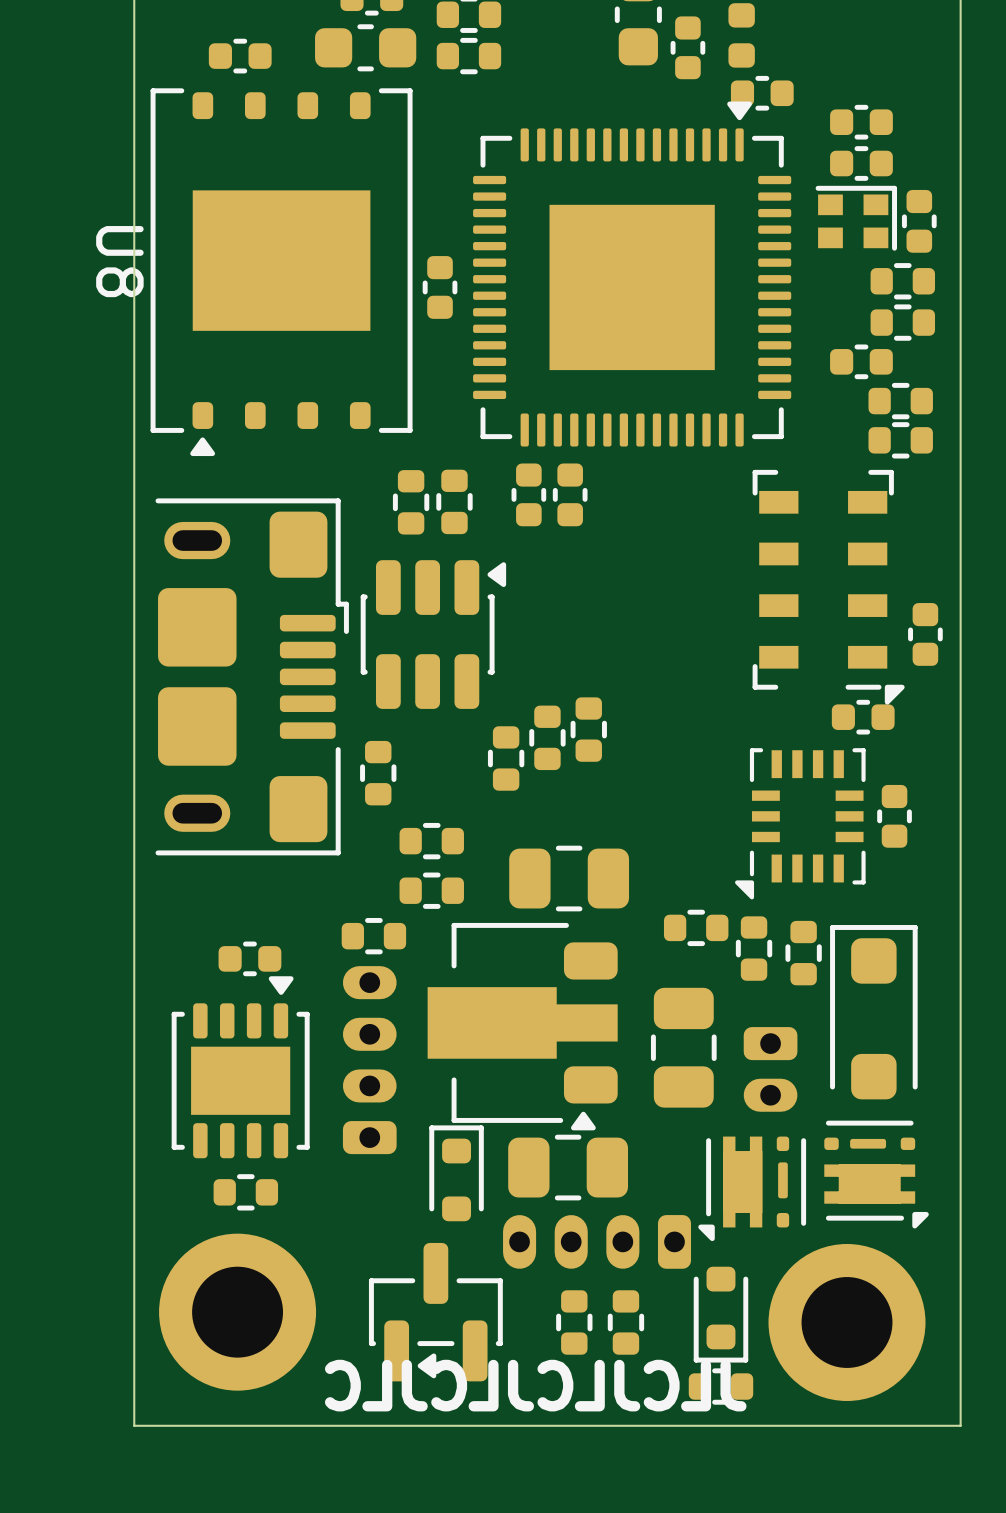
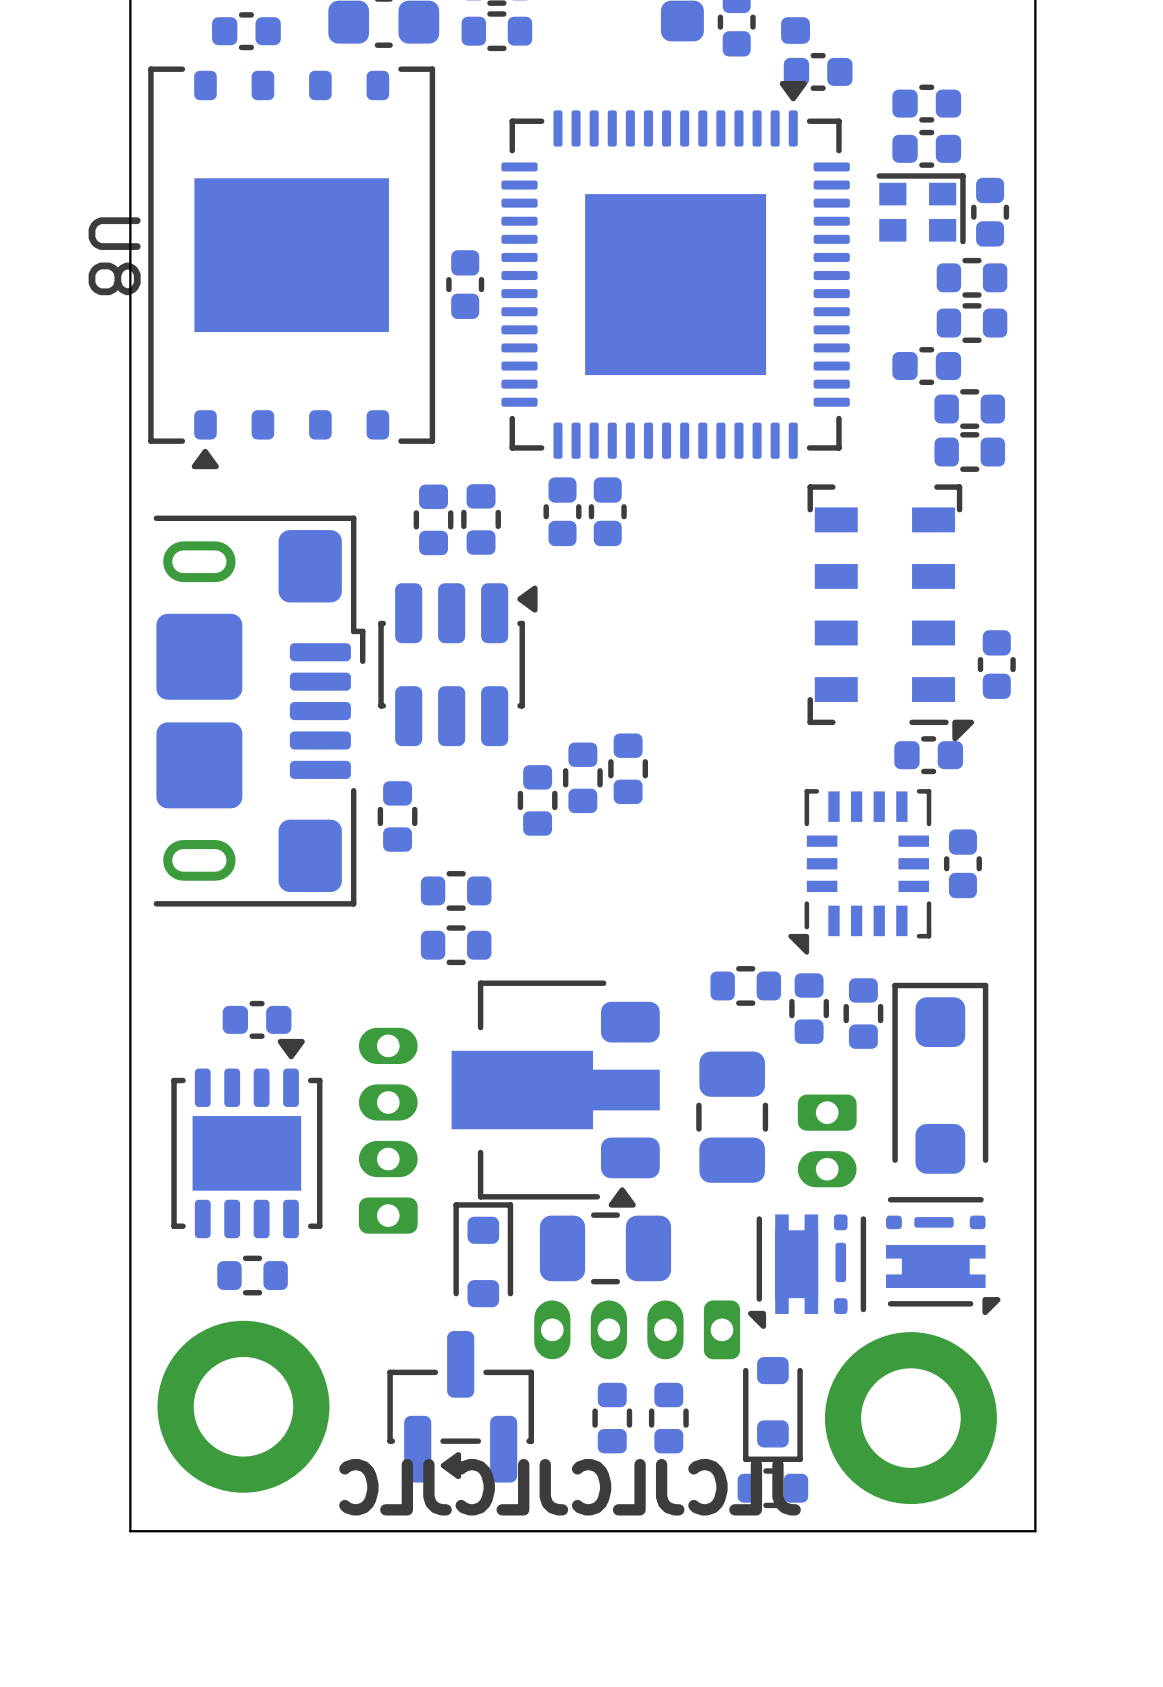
part: (569, 878) -> none
part: (373, 936) -> none

